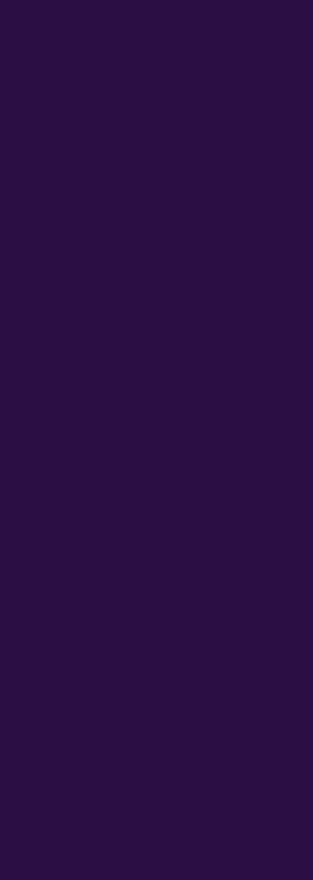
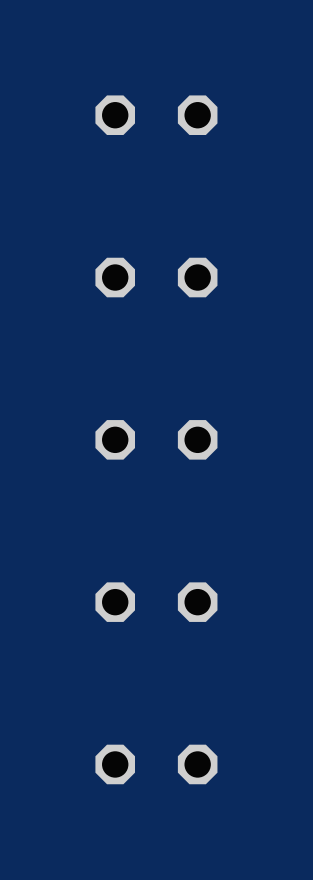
part: none -> (156, 115)
part: none -> (156, 277)
part: none -> (156, 439)
part: none -> (156, 602)
part: none -> (156, 764)

